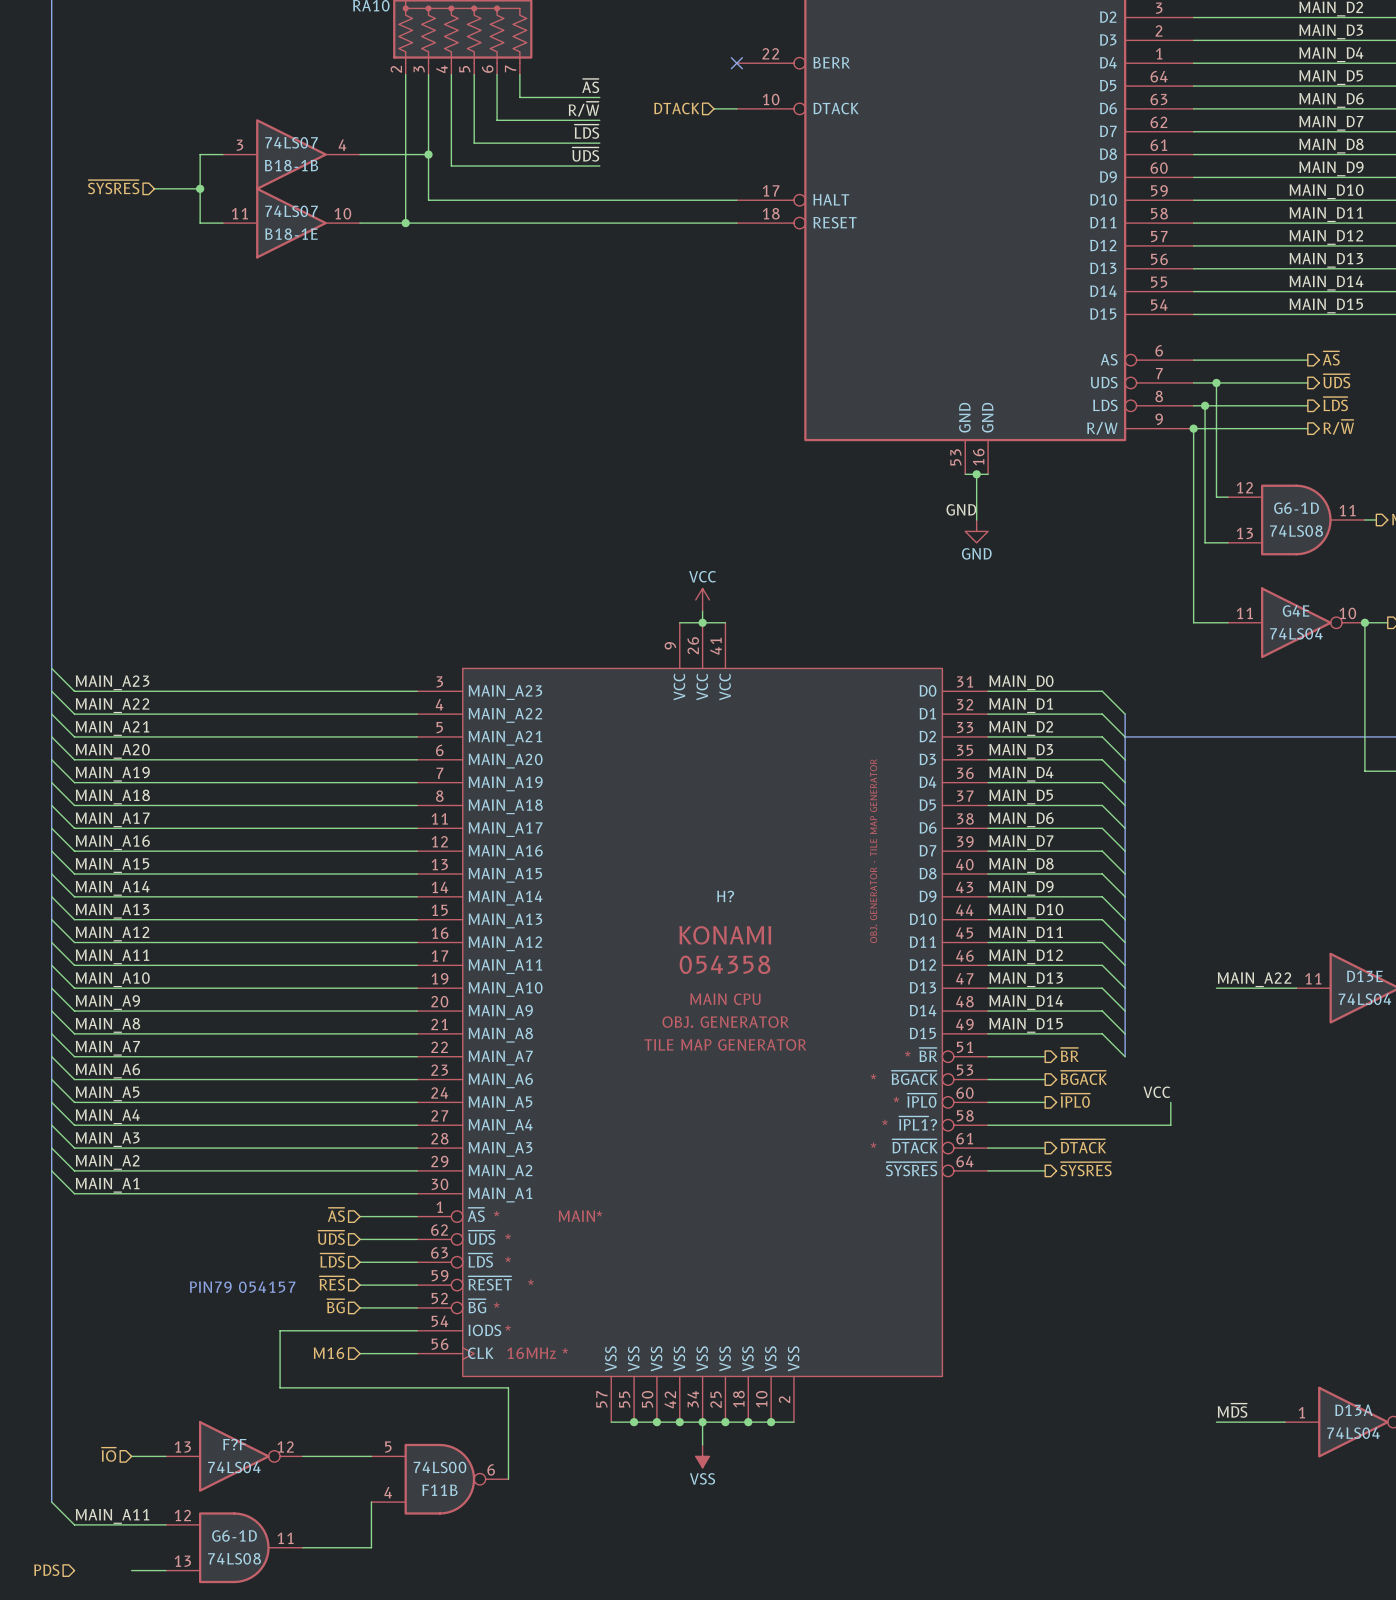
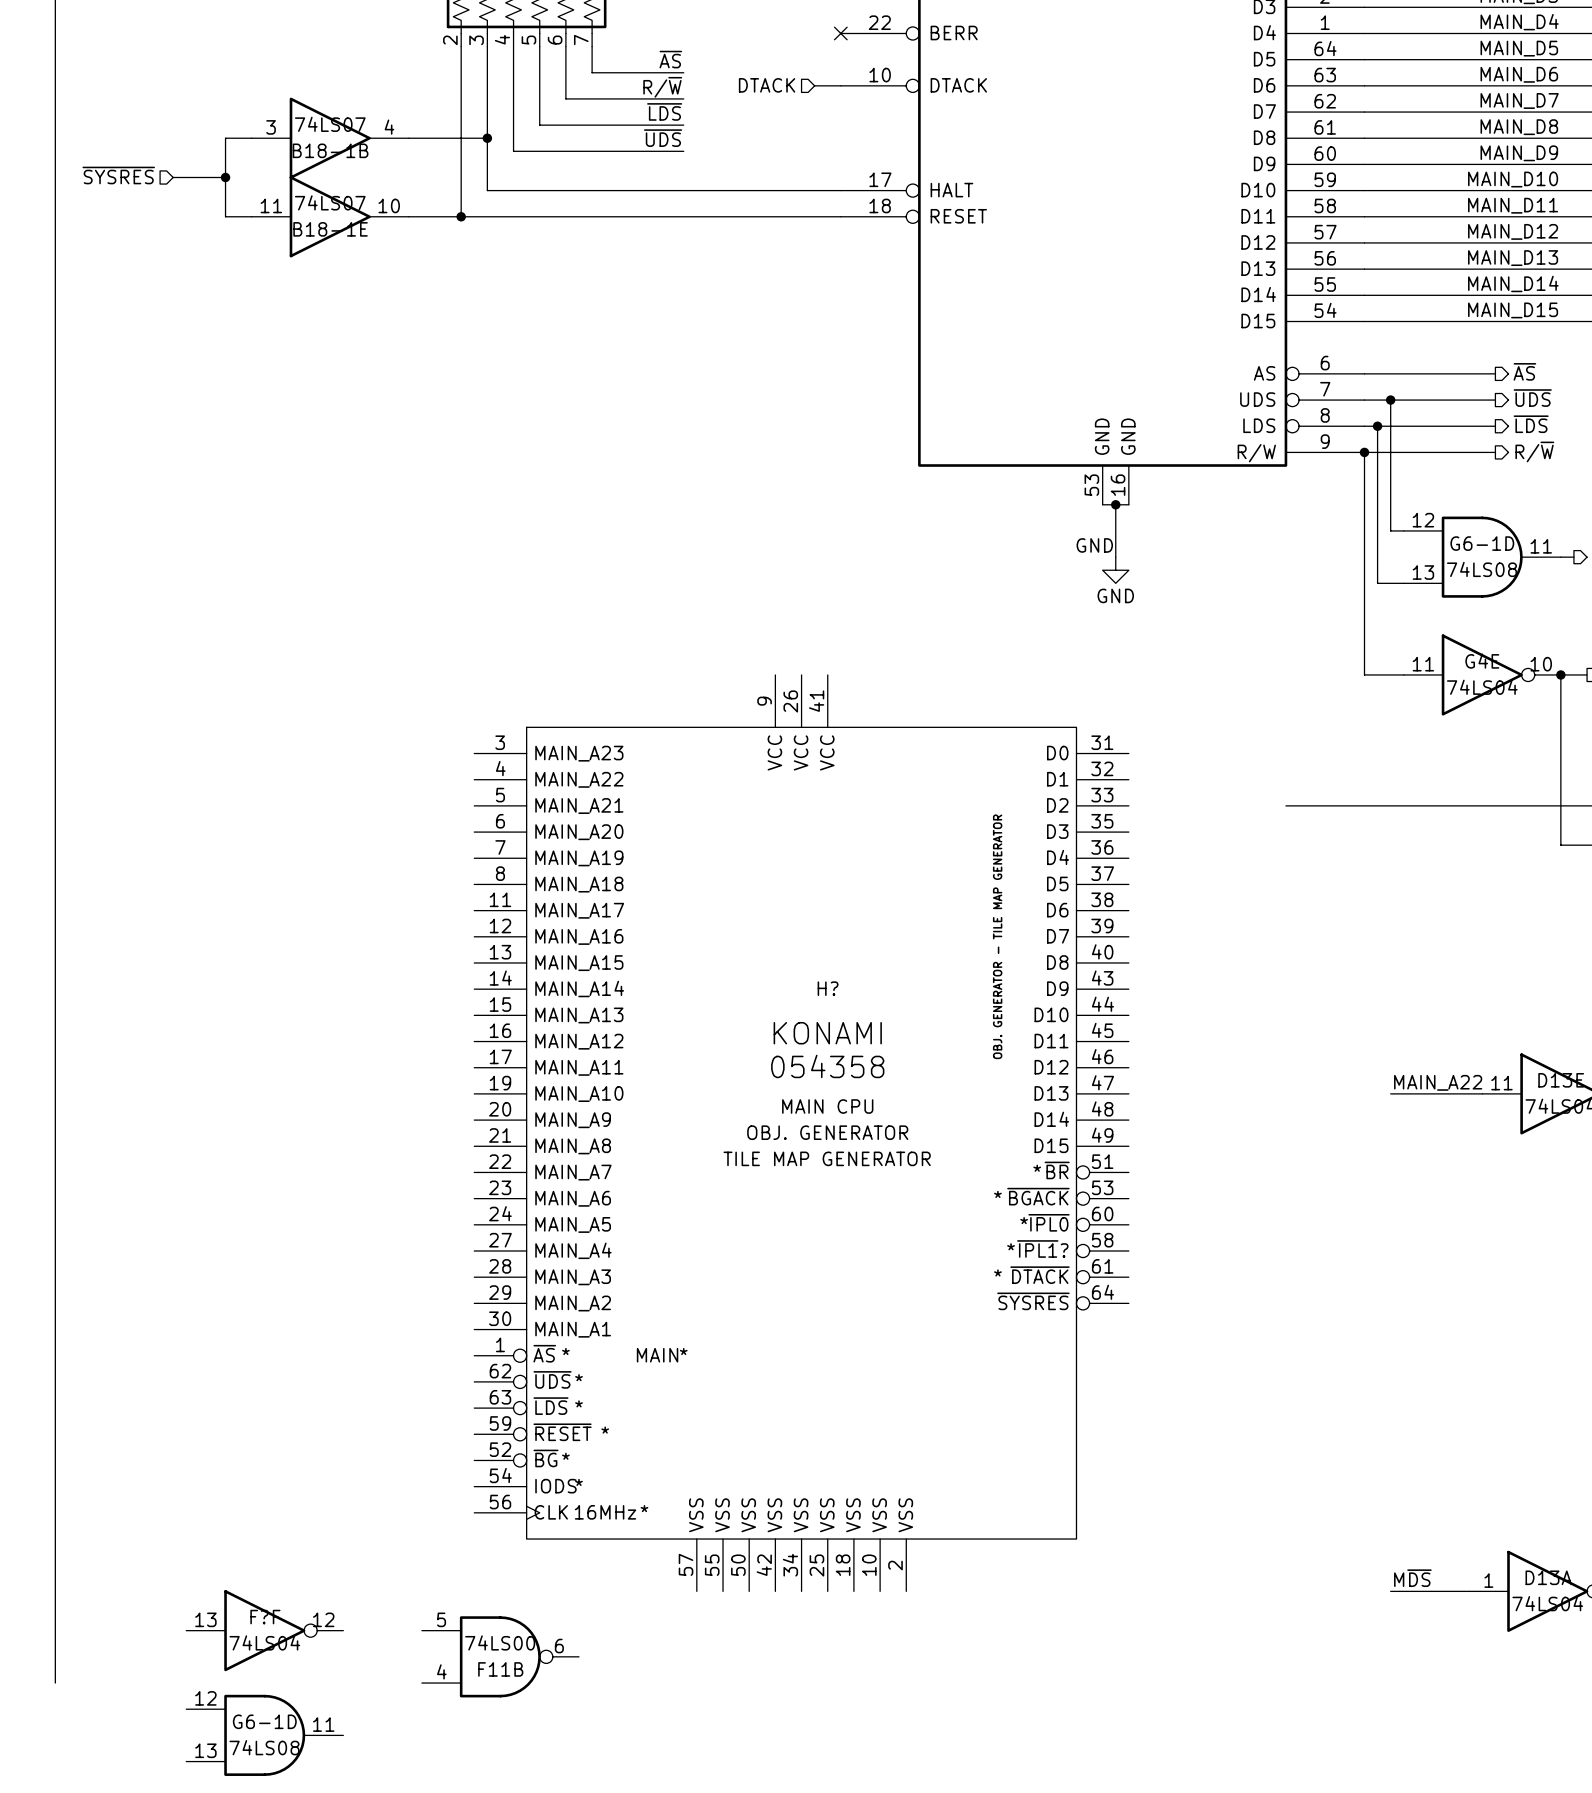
power symbol: VCC (702, 599) -> none
wire: (702, 611) (702, 622) -> none
wire: (679, 622) (725, 622) -> none
junction: (702, 622) -> none
wire: (51, 668) (74, 691) (417, 691) -> none
label: MAIN_A23 (112, 682) -> none
label: MAIN_D0 (1021, 682) -> none
wire: (51, 691) (74, 714) (417, 714) -> none
wire: (988, 691) (1102, 691) (1125, 714) -> none
label: MAIN_A22 (112, 705) -> none
label: MAIN_D1 (1021, 705) -> none
wire: (51, 714) (74, 736) (417, 736) -> none
wire: (988, 714) (1102, 714) (1125, 736) -> none
bus: (1125, 714) (1125, 1056) -> none
label: MAIN_A21 (112, 728) -> none
label: MAIN_D2 (1021, 728) -> none
wire: (51, 736) (74, 759) (417, 759) -> none
wire: (988, 736) (1102, 736) (1125, 759) -> none
label: MAIN_A20 (112, 751) -> none
label: MAIN_D3 (1021, 751) -> none
wire: (51, 759) (74, 782) (417, 782) -> none
wire: (988, 759) (1102, 759) (1125, 782) -> none
label: MAIN_A19 (112, 774) -> none
label: MAIN_D4 (1021, 774) -> none
wire: (51, 782) (74, 805) (417, 805) -> none
wire: (988, 782) (1102, 782) (1125, 805) -> none
label: MAIN_A18 (112, 797) -> none
label: MAIN_D5 (1021, 797) -> none
wire: (51, 805) (74, 828) (417, 828) -> none
wire: (988, 805) (1102, 805) (1125, 828) -> none
label: MAIN_A17 (112, 819) -> none
label: MAIN_D6 (1021, 819) -> none
wire: (51, 828) (74, 851) (417, 851) -> none
wire: (988, 828) (1102, 828) (1125, 851) -> none
label: MAIN_A16 (112, 842) -> none
label: MAIN_D7 (1021, 842) -> none
wire: (51, 851) (74, 874) (417, 874) -> none
wire: (988, 851) (1102, 851) (1125, 874) -> none
label: MAIN_A15 (112, 865) -> none
label: MAIN_D8 (1021, 865) -> none
wire: (51, 874) (74, 896) (417, 896) -> none
wire: (988, 874) (1102, 874) (1125, 896) -> none
label: MAIN_A14 (112, 888) -> none
label: MAIN_D9 (1021, 888) -> none
wire: (51, 896) (74, 919) (417, 919) -> none
wire: (988, 896) (1102, 896) (1125, 919) -> none
label: MAIN_A13 (112, 911) -> none
label: MAIN_D10 (1026, 911) -> none
wire: (51, 919) (74, 942) (417, 942) -> none
wire: (988, 919) (1102, 919) (1125, 942) -> none
label: MAIN_A12 (112, 934) -> none
label: MAIN_D11 (1026, 934) -> none
wire: (51, 942) (74, 965) (417, 965) -> none
wire: (988, 942) (1102, 942) (1125, 965) -> none
label: MAIN_A11 (112, 956) -> none
label: MAIN_D12 (1026, 956) -> none
wire: (51, 965) (74, 988) (417, 988) -> none
wire: (988, 965) (1102, 965) (1125, 988) -> none
label: MAIN_A10 (112, 979) -> none
label: MAIN_D13 (1026, 979) -> none
wire: (51, 988) (74, 1011) (417, 1011) -> none
wire: (988, 988) (1102, 988) (1125, 1011) -> none
label: MAIN_A9 (107, 1002) -> none
label: MAIN_D14 (1026, 1002) -> none
wire: (51, 1011) (74, 1033) (417, 1033) -> none
wire: (988, 1011) (1102, 1011) (1125, 1033) -> none
label: MAIN_A8 (107, 1025) -> none
label: MAIN_D15 (1026, 1025) -> none
wire: (51, 1033) (74, 1056) (417, 1056) -> none
wire: (988, 1033) (1102, 1033) (1125, 1056) -> none
label: MAIN_A7 (107, 1048) -> none
hierarchical label: ~{BR} (1069, 1054) -> none
wire: (51, 1056) (74, 1079) (417, 1079) -> none
wire: (988, 1056) (1045, 1056) -> none
label: MAIN_A6 (107, 1071) -> none
hierarchical label: ~{BGACK} (1083, 1077) -> none
wire: (51, 1079) (74, 1102) (417, 1102) -> none
wire: (988, 1079) (1045, 1079) -> none
label: VCC (1156, 1092) -> none
label: MAIN_A5 (107, 1093) -> none
hierarchical label: ~{IPL0} (1075, 1100) -> none
wire: (51, 1102) (74, 1125) (417, 1125) -> none
wire: (988, 1102) (1045, 1102) -> none
wire: (1170, 1102) (1170, 1125) (988, 1125) -> none
label: MAIN_A4 (107, 1116) -> none
wire: (51, 1125) (74, 1148) (417, 1148) -> none
label: MAIN_A3 (107, 1139) -> none
hierarchical label: ~{DTACK} (1083, 1146) -> none
wire: (51, 1148) (74, 1170) (417, 1170) -> none
wire: (988, 1148) (1045, 1148) -> none
label: MAIN_A2 (107, 1162) -> none
hierarchical label: ~{SYSRES} (1085, 1169) -> none
wire: (51, 1170) (74, 1193) (417, 1193) -> none
wire: (988, 1170) (1045, 1170) -> none
label: MAIN_A1 (107, 1185) -> none
hierarchical label: ~{AS} (336, 1214) -> none
wire: (360, 1216) (417, 1216) -> none
hierarchical label: ~{UDS} (331, 1237) -> none
wire: (360, 1239) (417, 1239) -> none
hierarchical label: ~{LDS} (332, 1260) -> none
wire: (360, 1262) (417, 1262) -> none
hierarchical label: ~{RES} (332, 1283) -> none
wire: (360, 1285) (417, 1285) -> none
text: PIN79 054157 (242, 1287) -> none
hierarchical label: ~{BG} (335, 1306) -> none
wire: (360, 1307) (417, 1307) -> none
wire: (417, 1330) (280, 1330) (280, 1387) (508, 1387) (508, 1479) -> none
hierarchical label: M16 (328, 1353) -> none
wire: (360, 1353) (417, 1353) -> none
wire: (611, 1422) (793, 1422) -> none
junction: (634, 1422) -> none
junction: (656, 1422) -> none
junction: (679, 1422) -> none
wire: (702, 1422) (702, 1444) -> none
junction: (702, 1422) -> none
junction: (725, 1422) -> none
junction: (748, 1422) -> none
junction: (771, 1422) -> none
hierarchical label: ~{IO} (108, 1454) -> none
wire: (131, 1456) (165, 1456) -> none
wire: (302, 1456) (371, 1456) -> none
power symbol: VSS (702, 1456) -> none
wire: (51, 1502) (74, 1524) (165, 1524) -> none
wire: (371, 1502) (371, 1547) (302, 1547) -> none
label: MAIN_A11 (112, 1516) -> none
hierarchical label: PDS (46, 1570) -> none
wire: (131, 1570) (165, 1570) -> none

